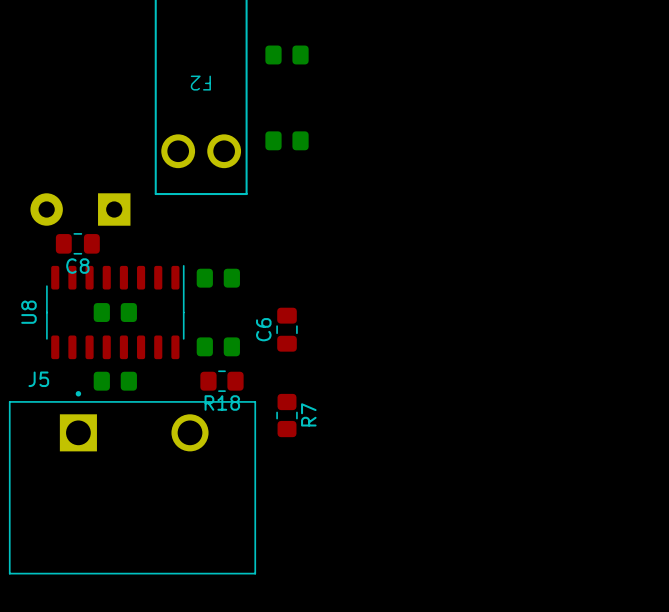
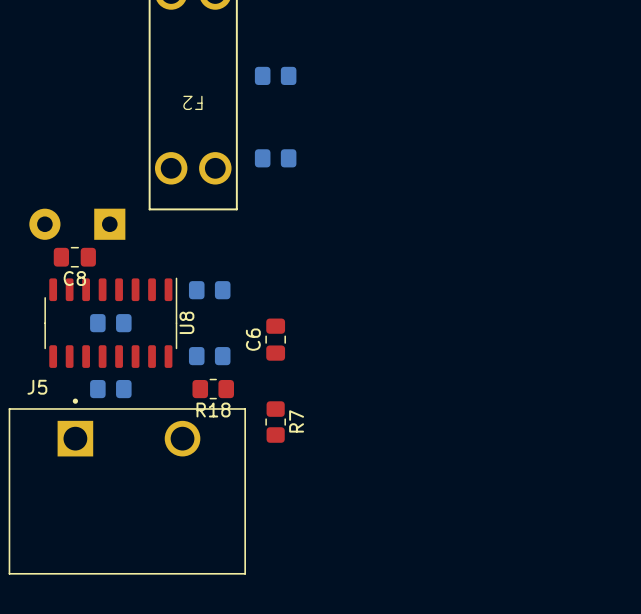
U8 name position: U8 (28, 312) -> U8 (186, 322)

